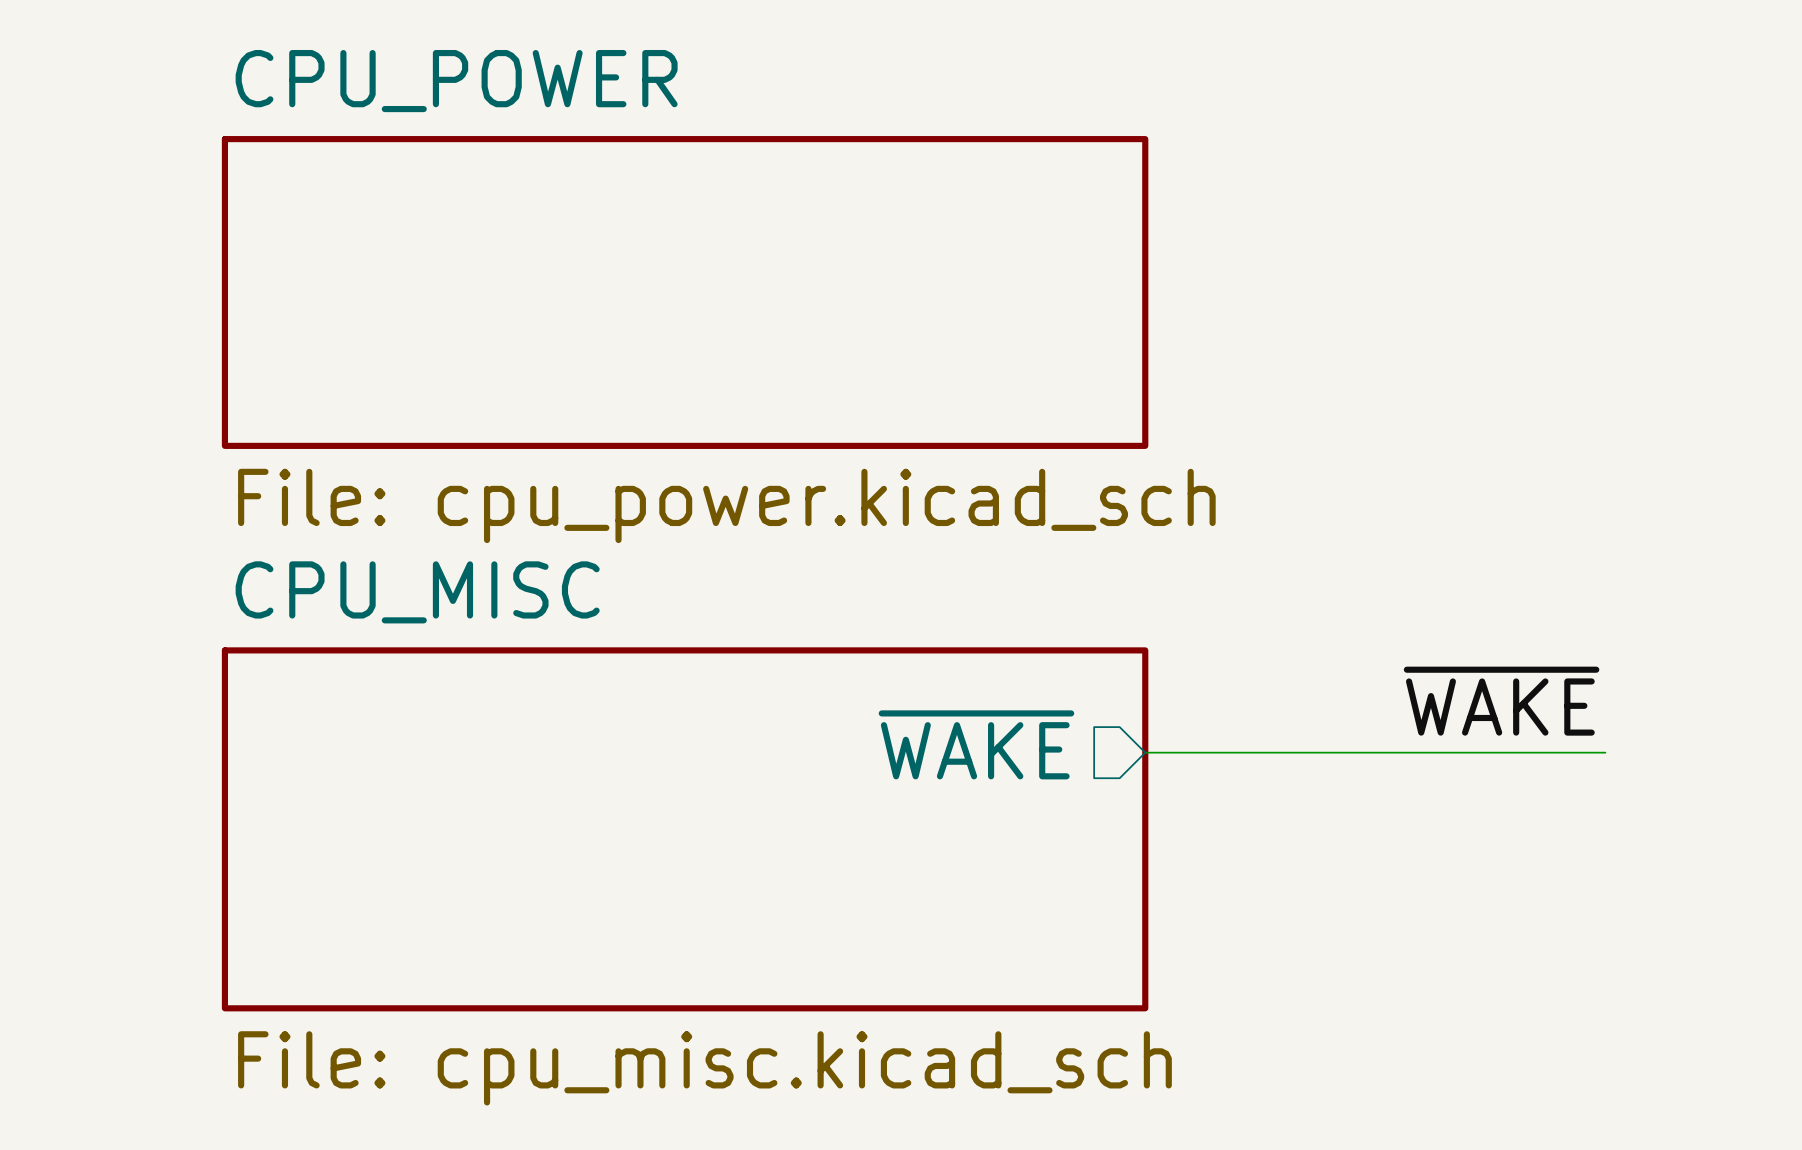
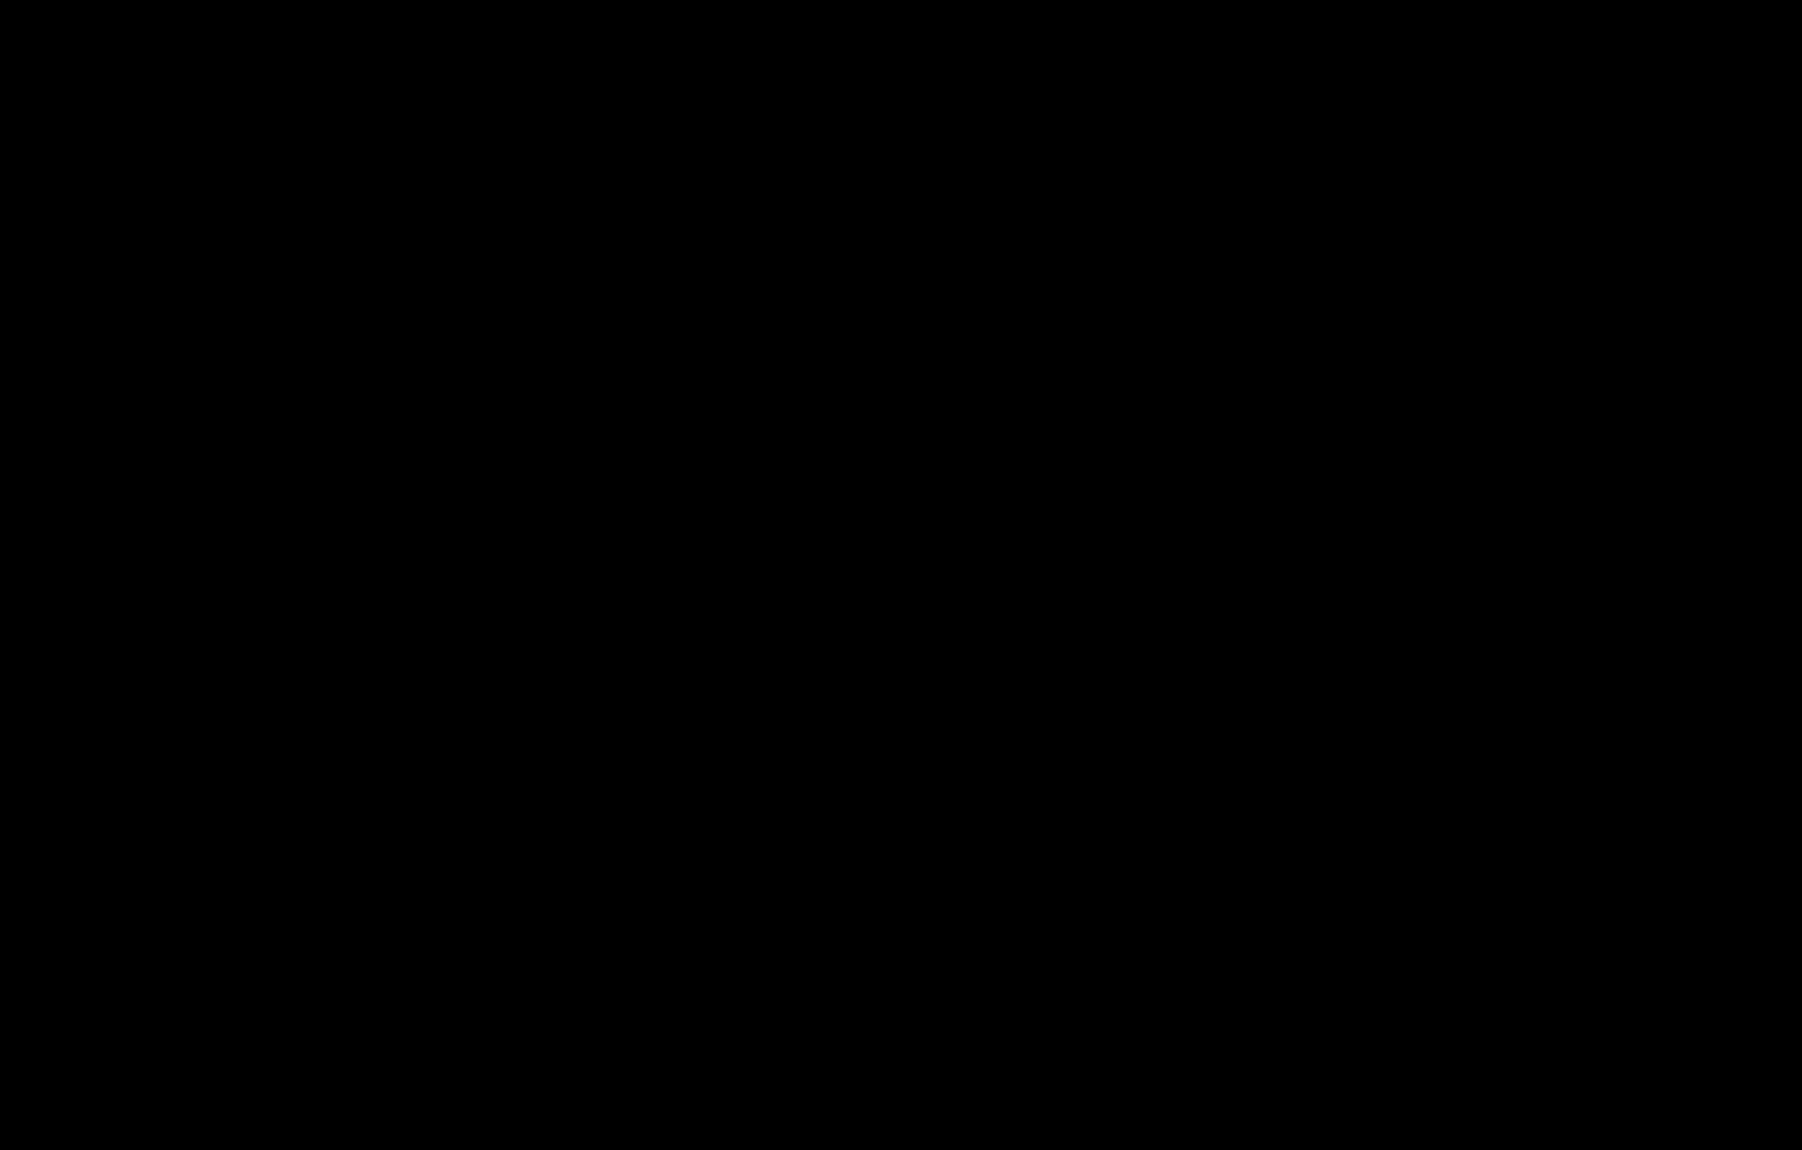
sheet CPU_POWER: File: cpu_power.kicad_sch (685, 292) -> none
label: ~{WAKE} (1501, 701) -> none
sheet pin: ~{WAKE} (976, 744) -> none
wire: (1145, 752) (1605, 752) -> none
sheet CPU_MISC: File: cpu_misc.kicad_sch (685, 829) -> none

